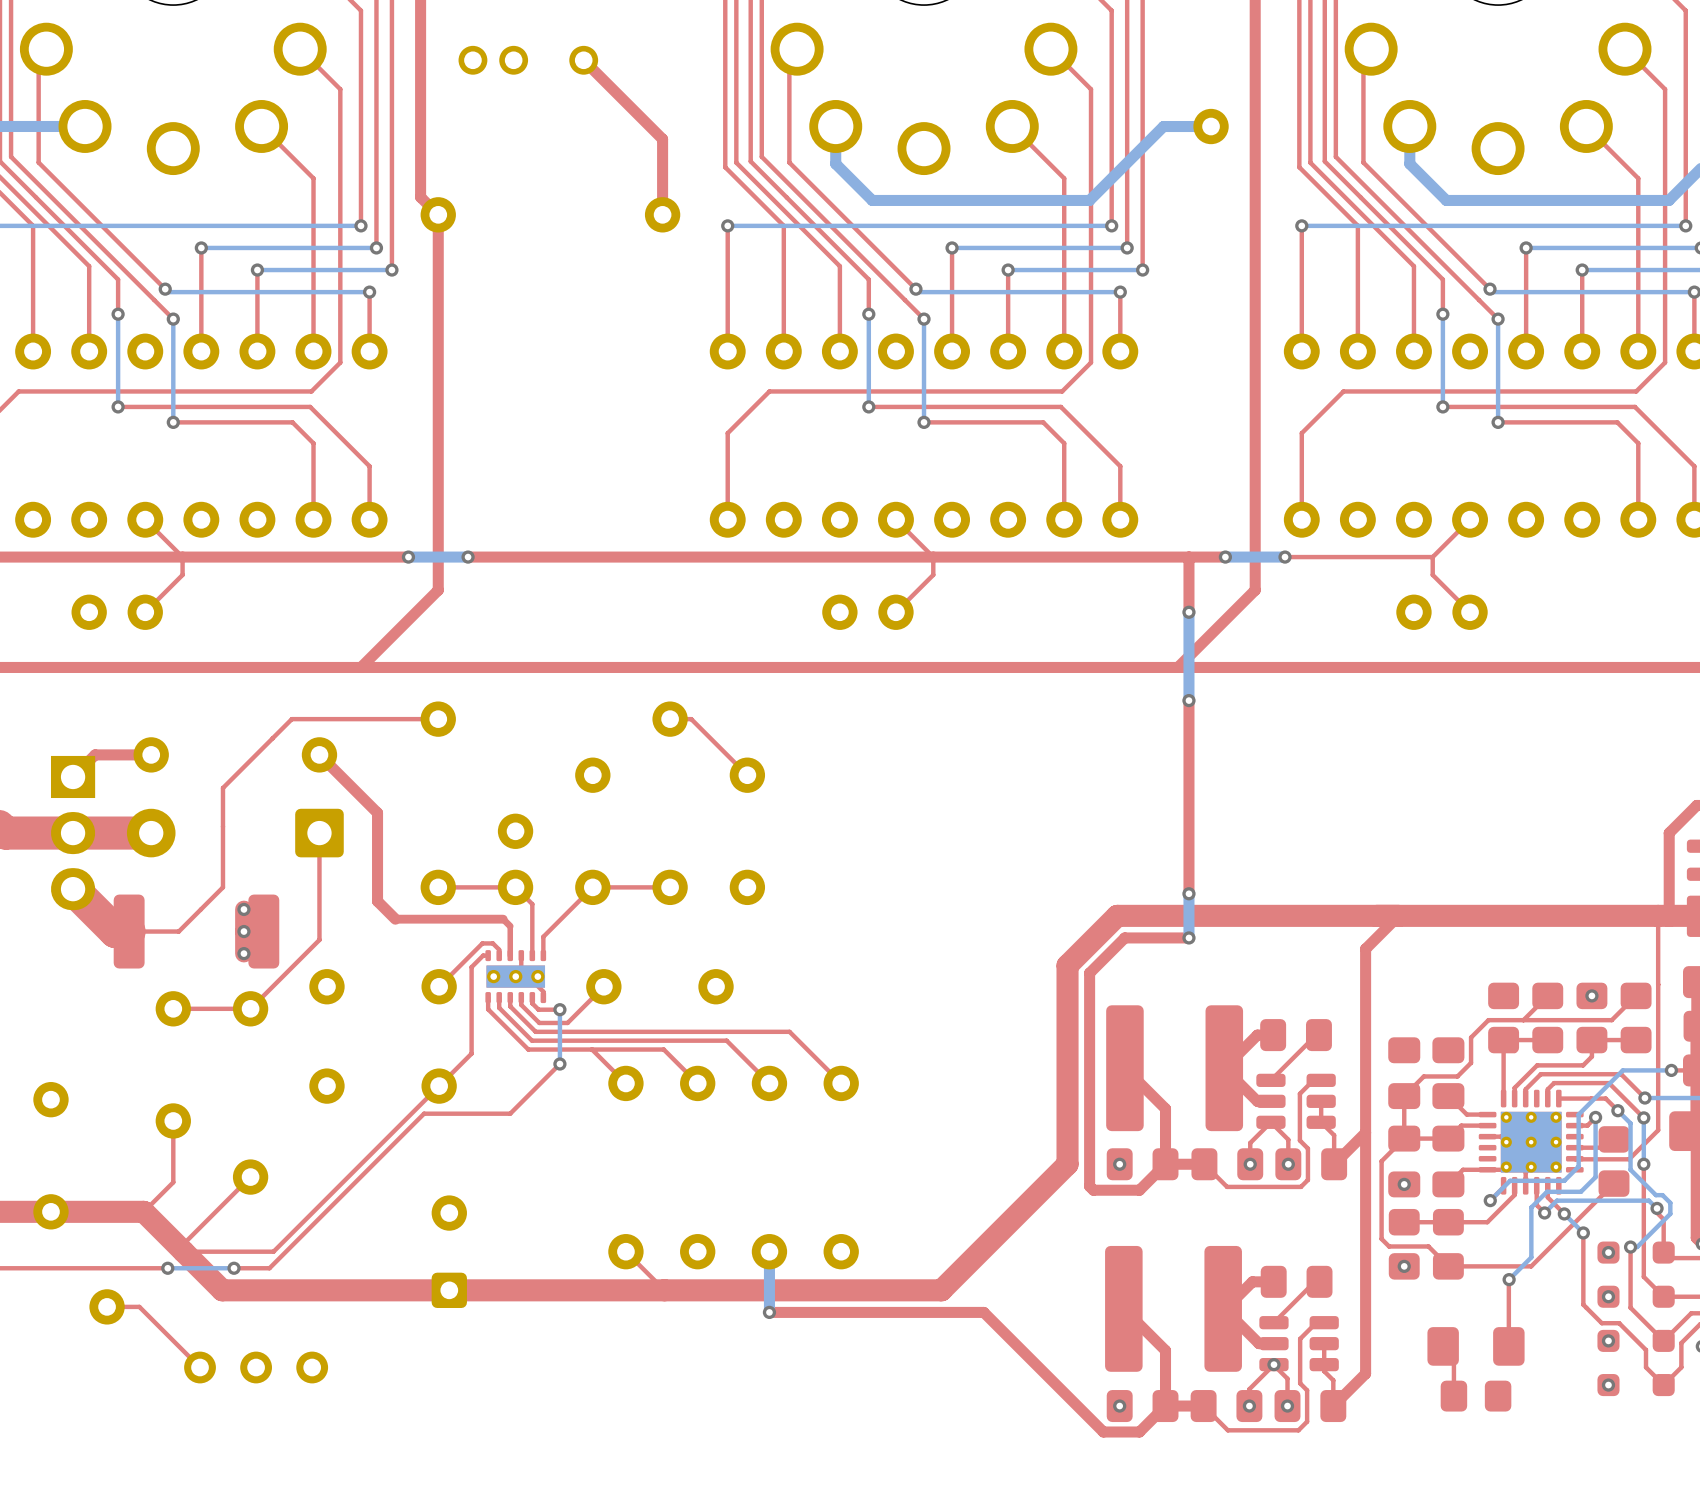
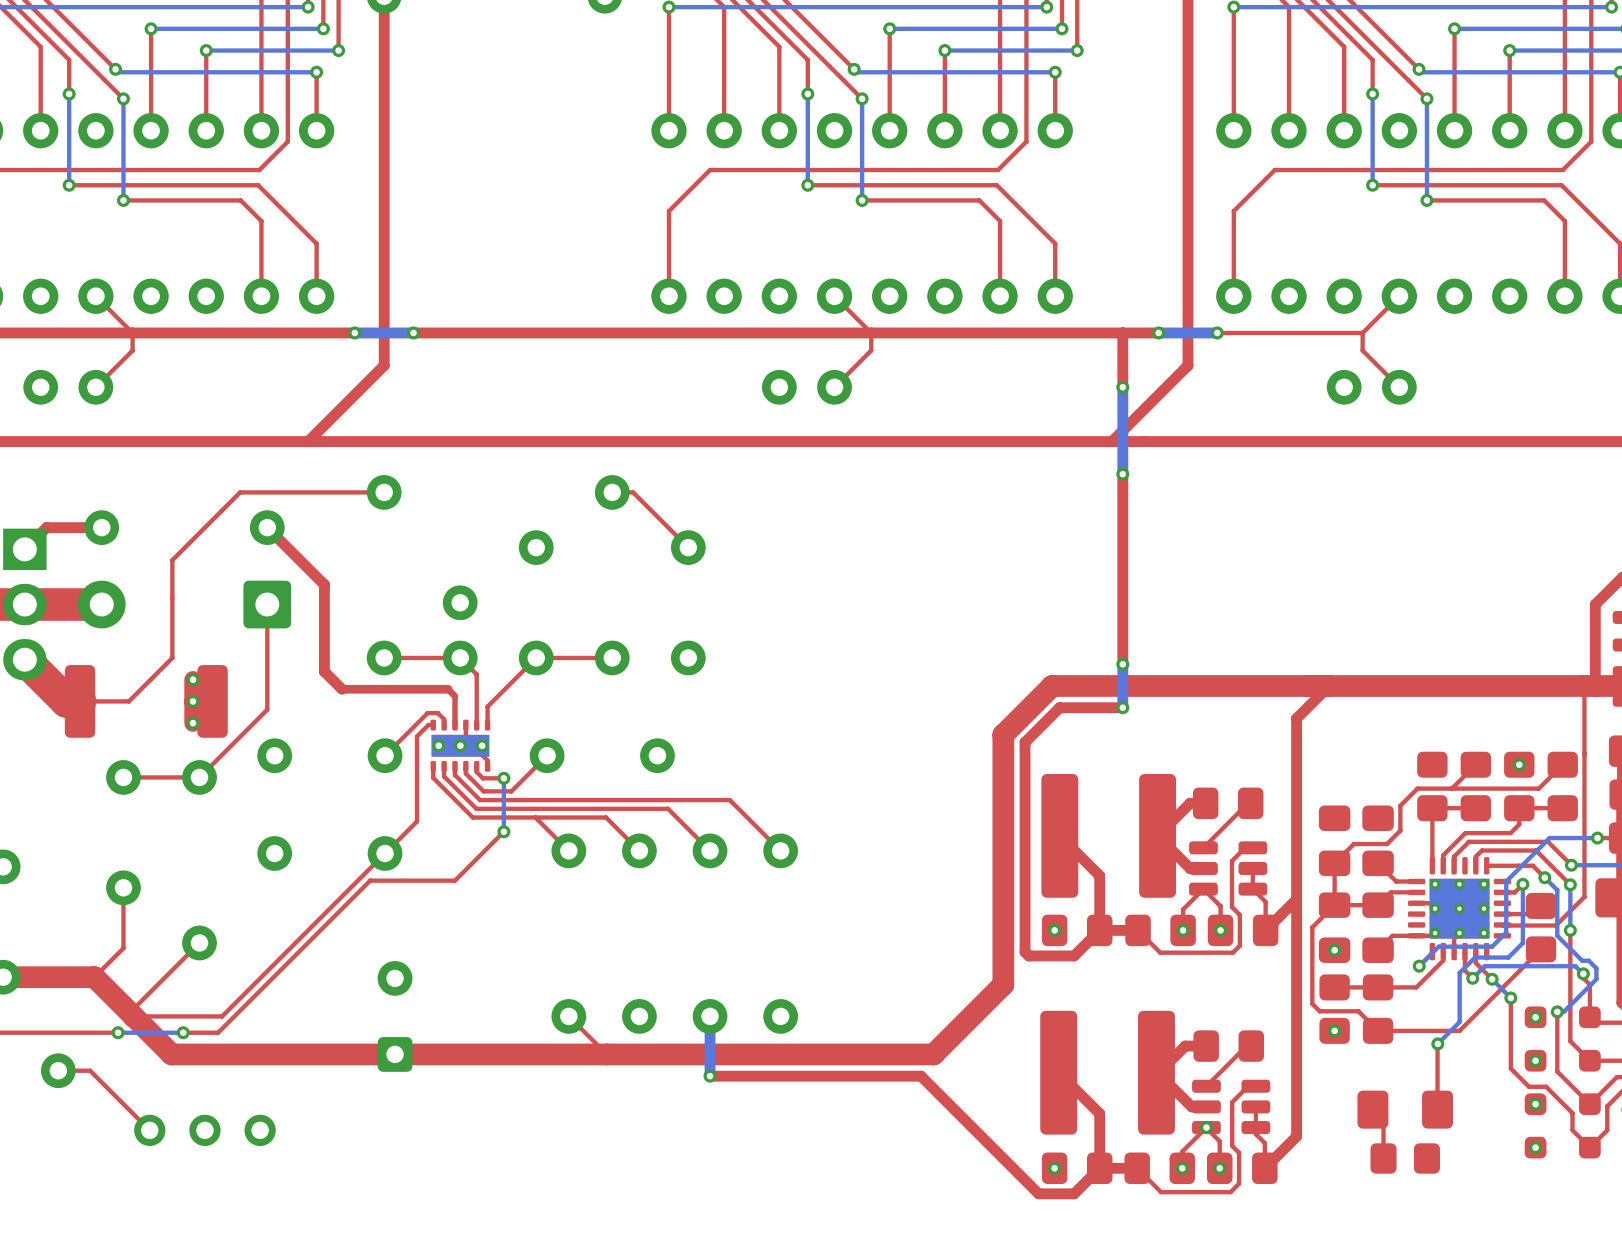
top track: (1067, 1164) (941, 1290) -> (1003, 930) (1003, 984) (933, 1054) (879, 1054)

